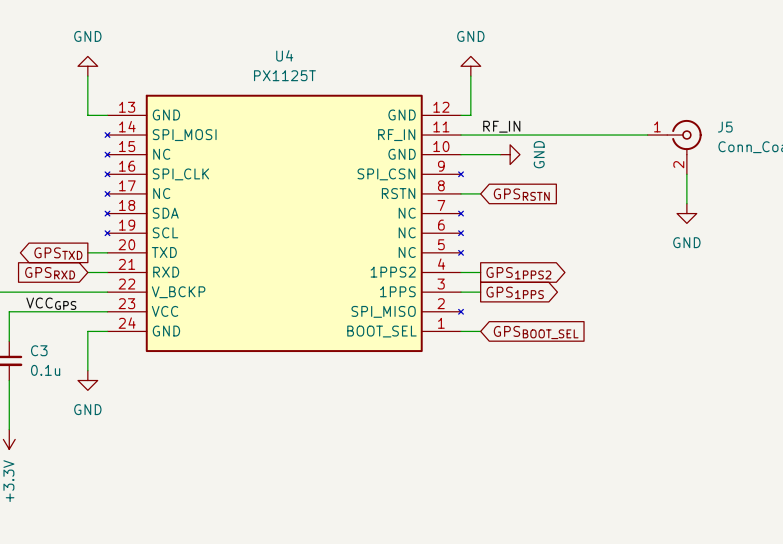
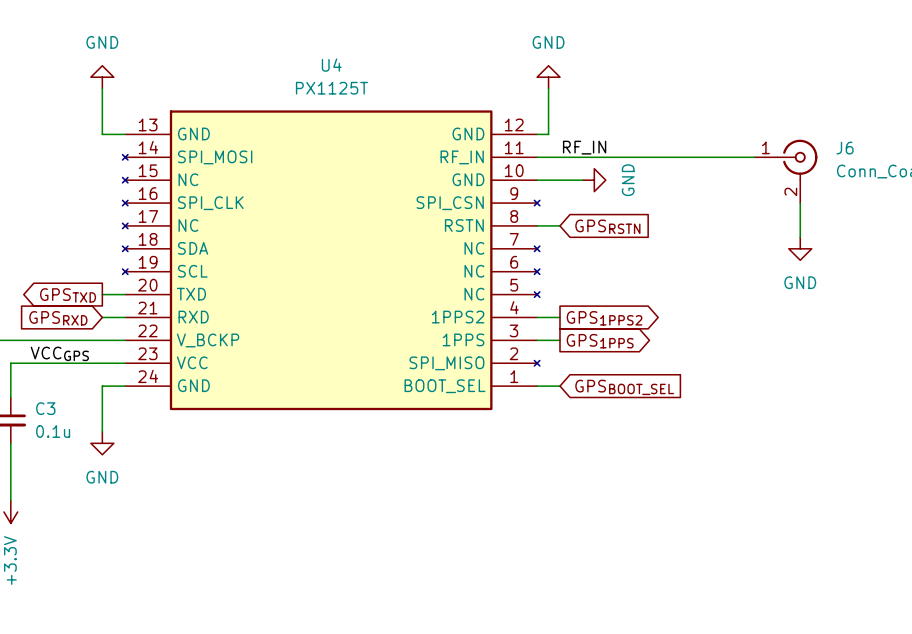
J5 name: J5 (725, 127) -> J6 (845, 148)

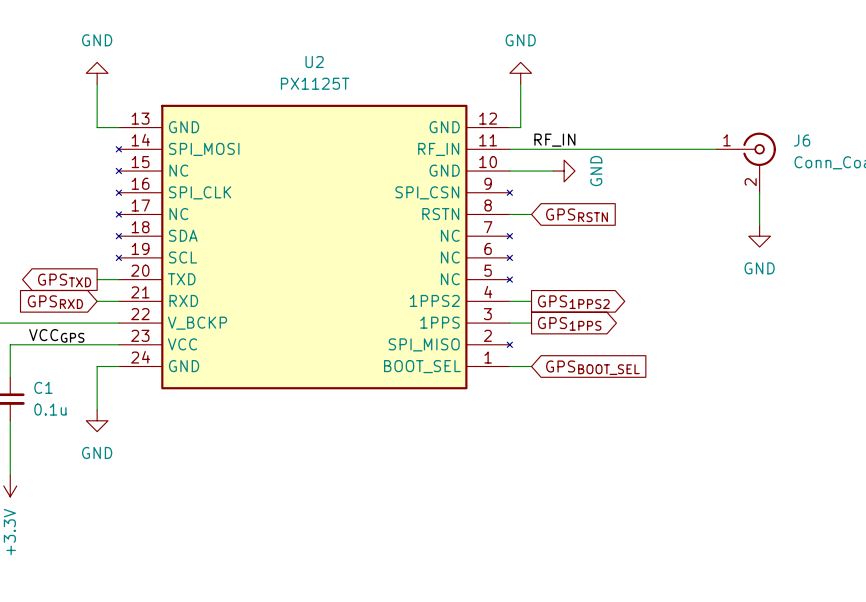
U4 name: U4 (331, 65) -> U2 (314, 62)
C3 name: C3 (45, 408) -> C1 (43, 387)

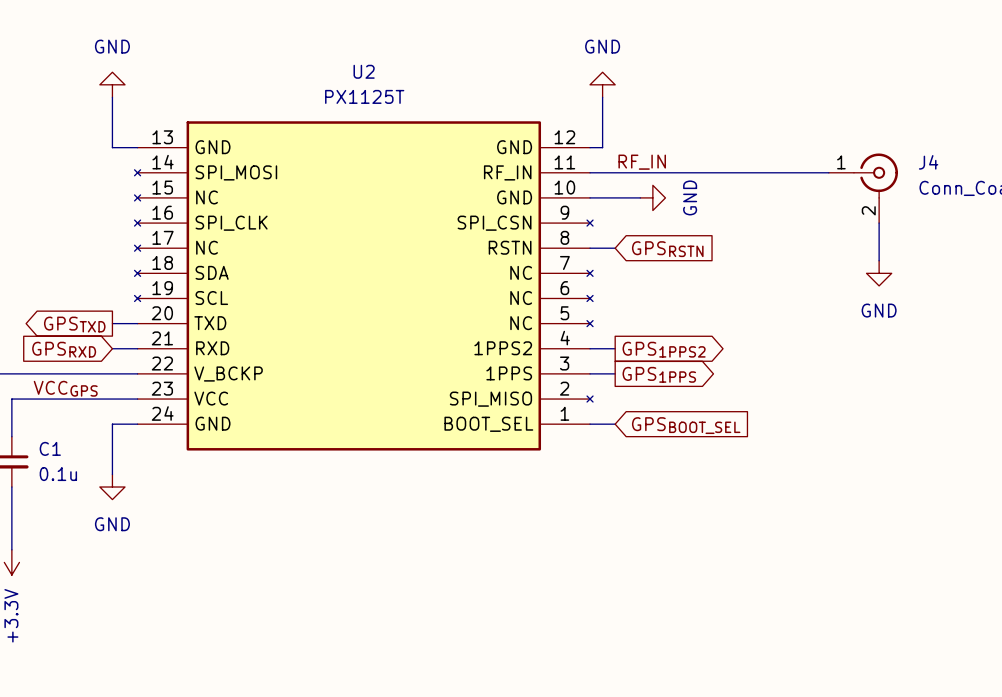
J6 name: J6 (802, 140) -> J4 (928, 162)

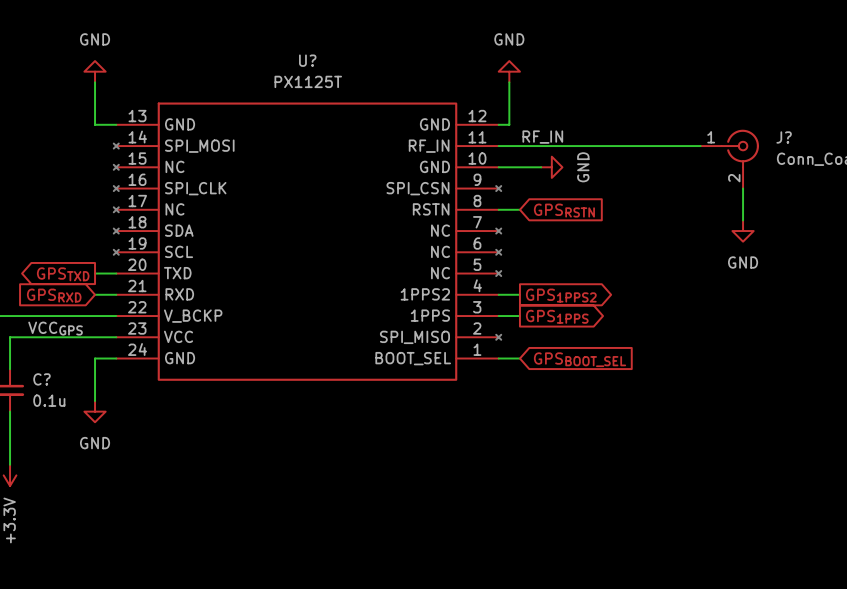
U2 name: U2 (364, 71) -> U? (307, 60)
J4 name: J4 (928, 162) -> J? (784, 137)
C1 name: C1 (50, 448) -> C? (41, 379)

